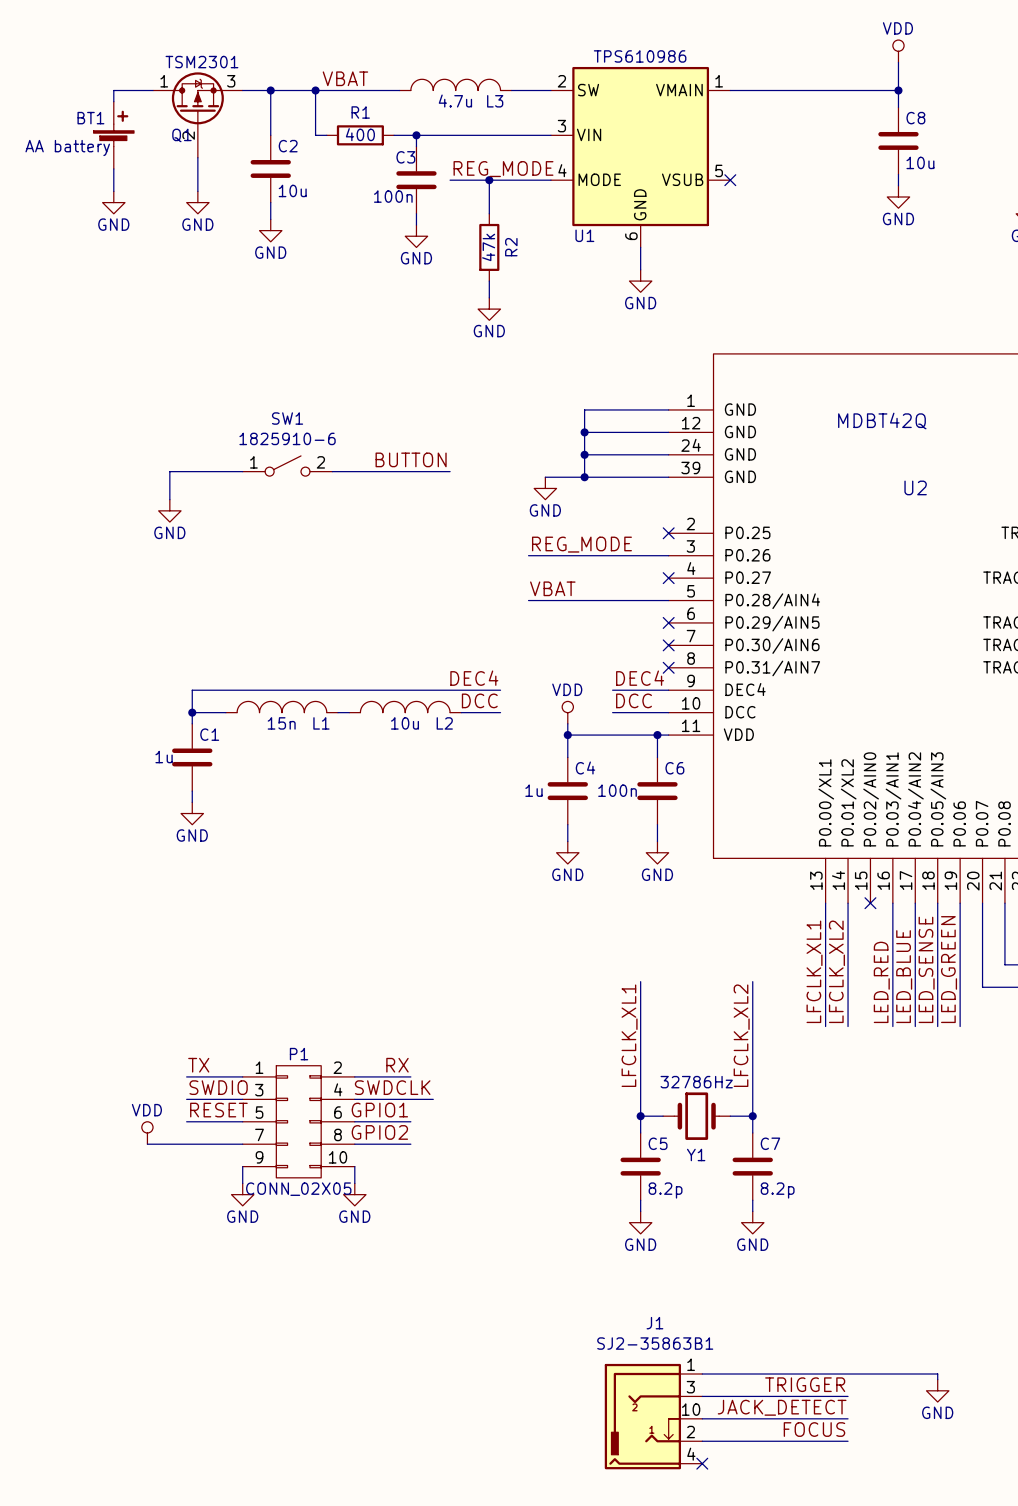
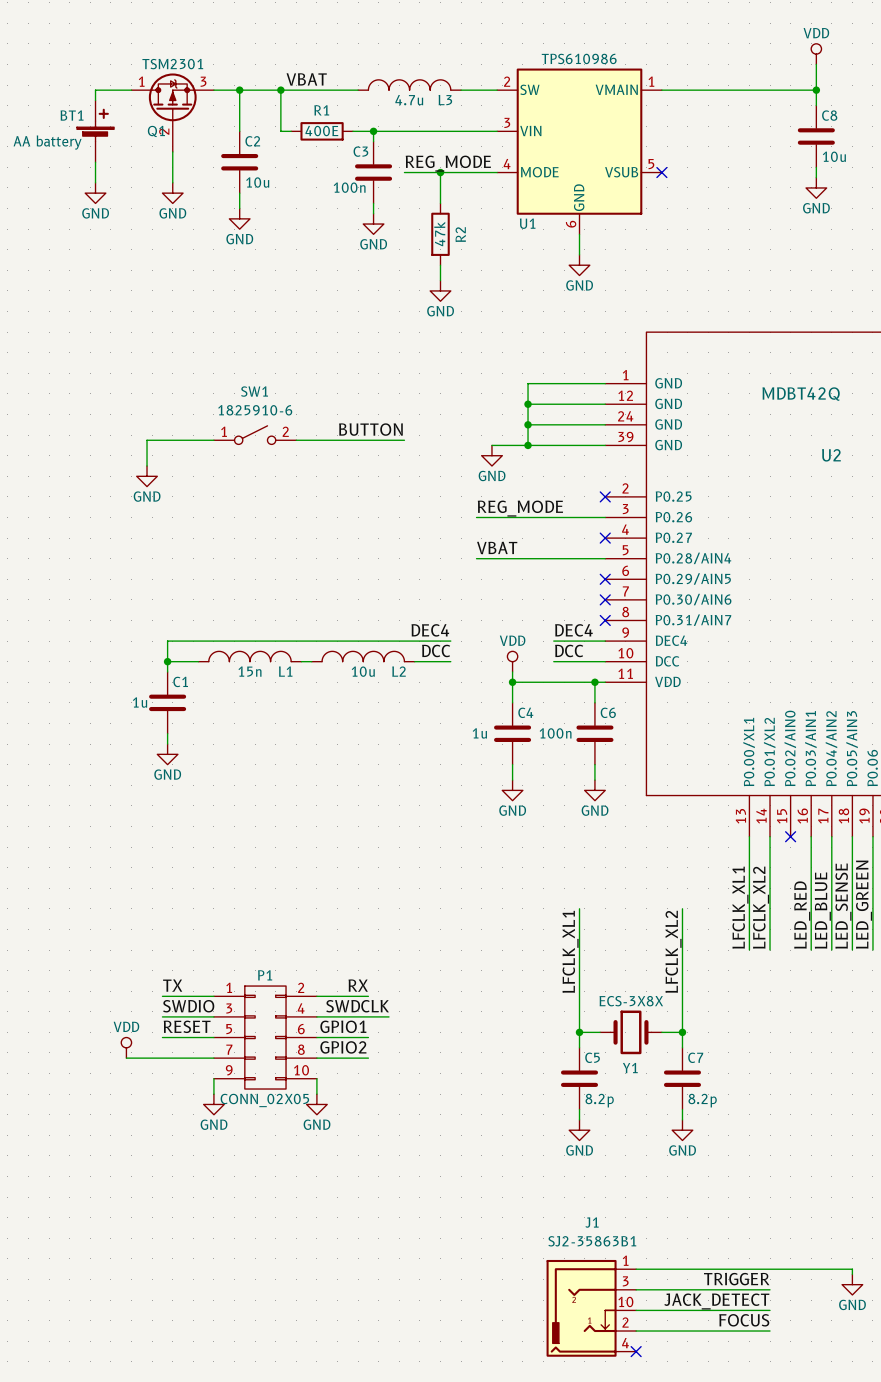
R1 value: 400 (360, 134) -> 400E (321, 131)
Y1 value: 32786Hz (696, 1082) -> ECS-3X8X (631, 1001)

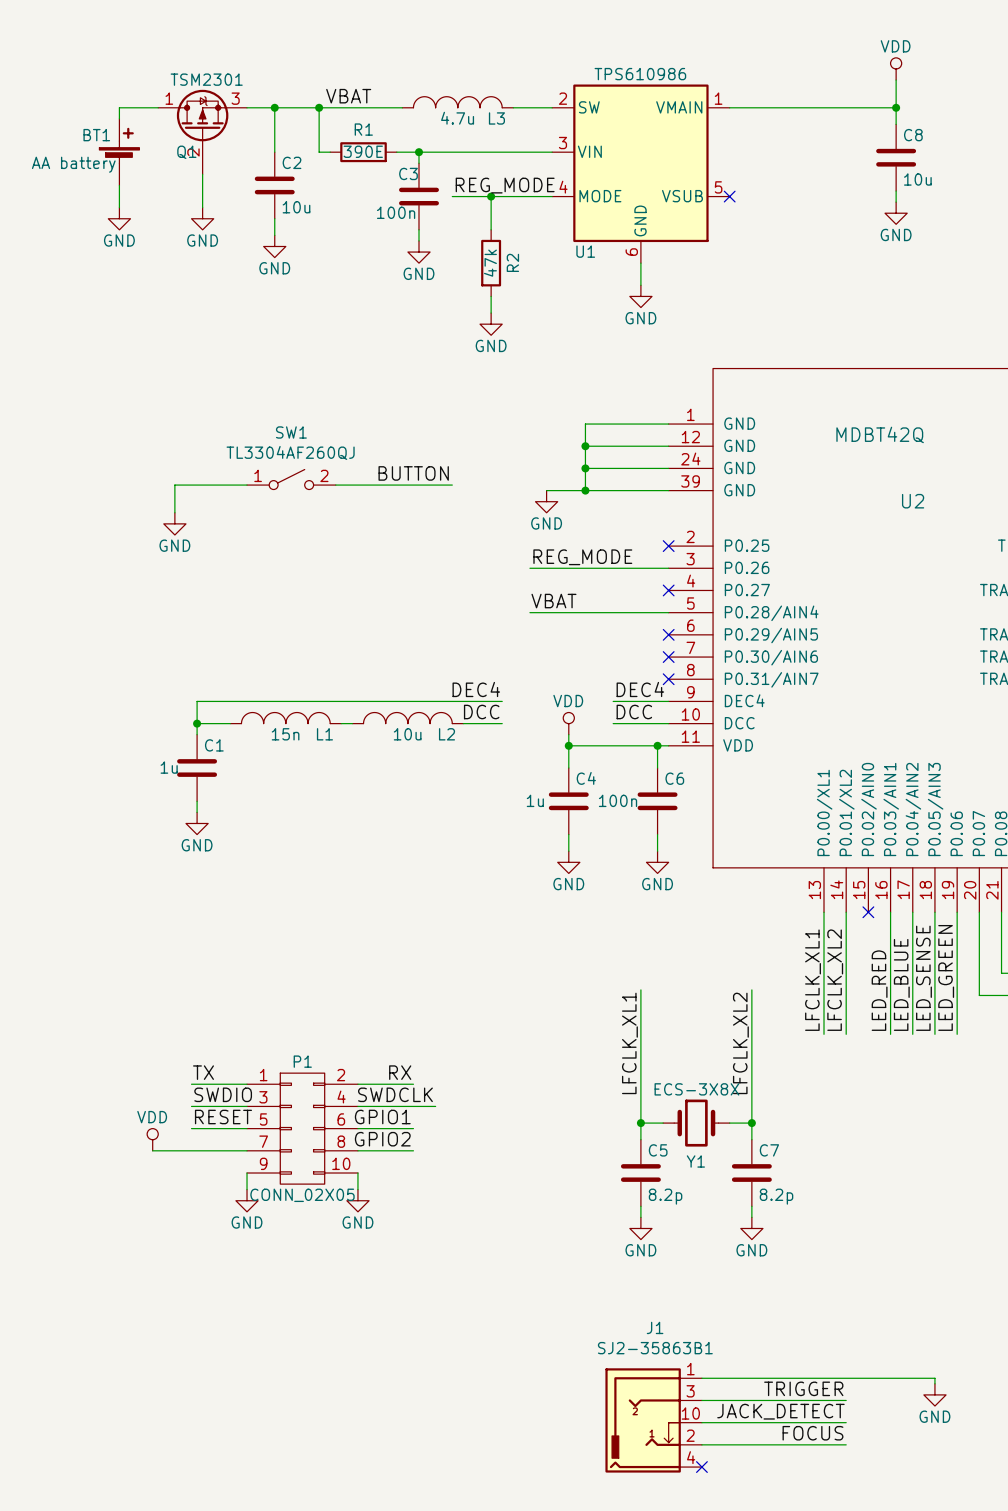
R1 value: 400E (321, 131) -> 390E (363, 151)
SW1 value: 1825910-6 (255, 410) -> TL3304AF260QJ (290, 452)

